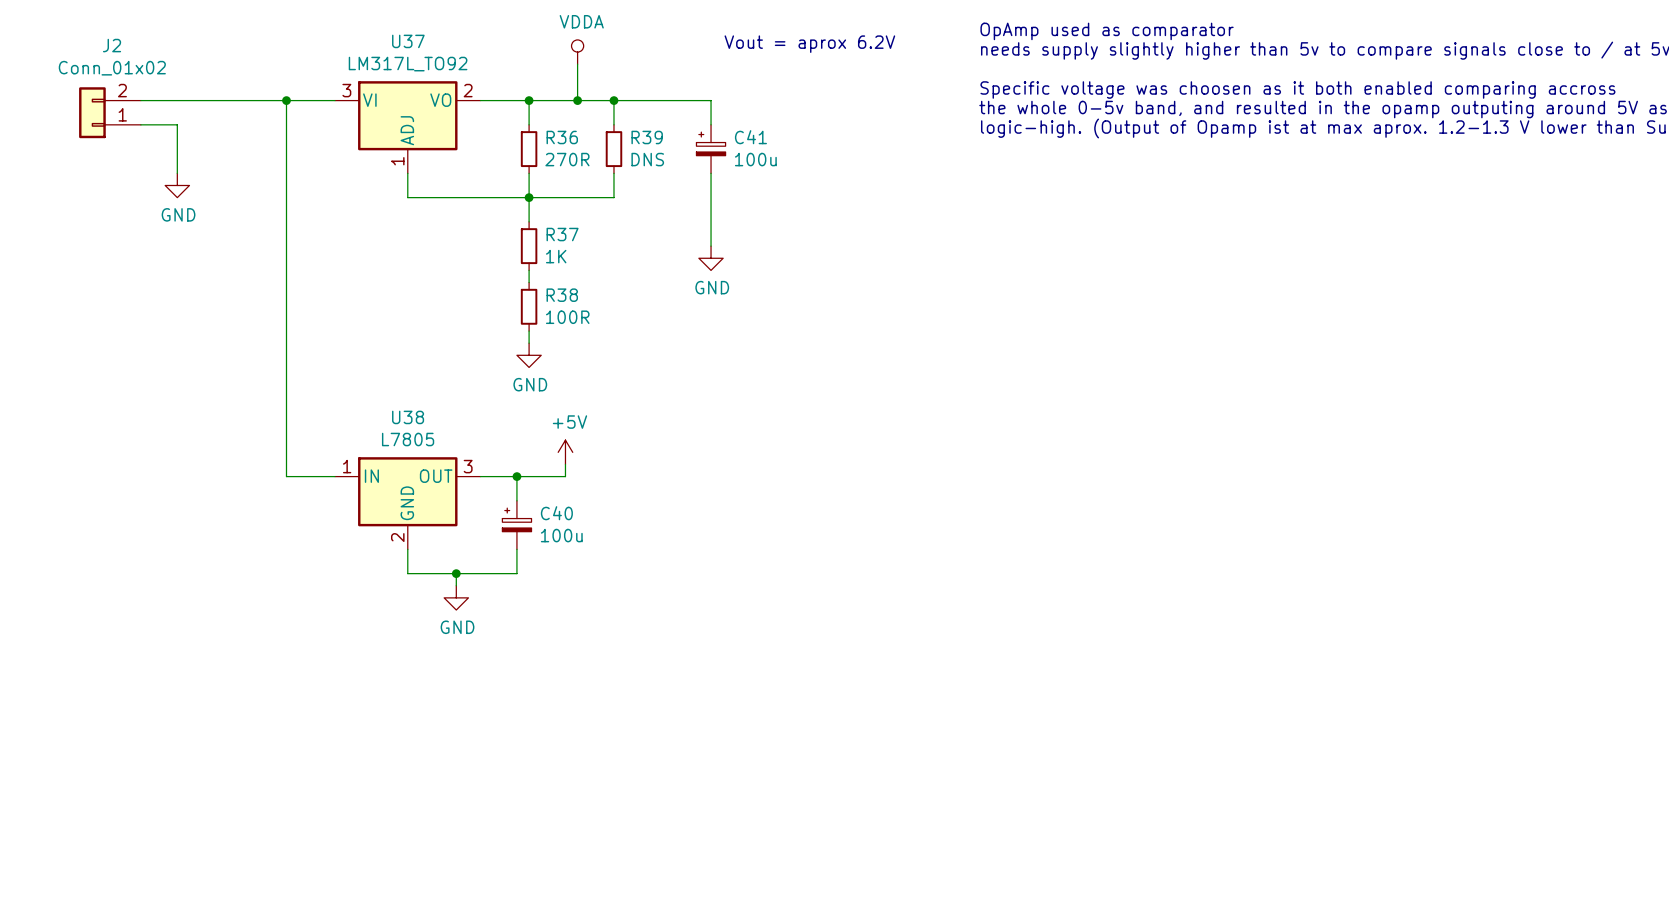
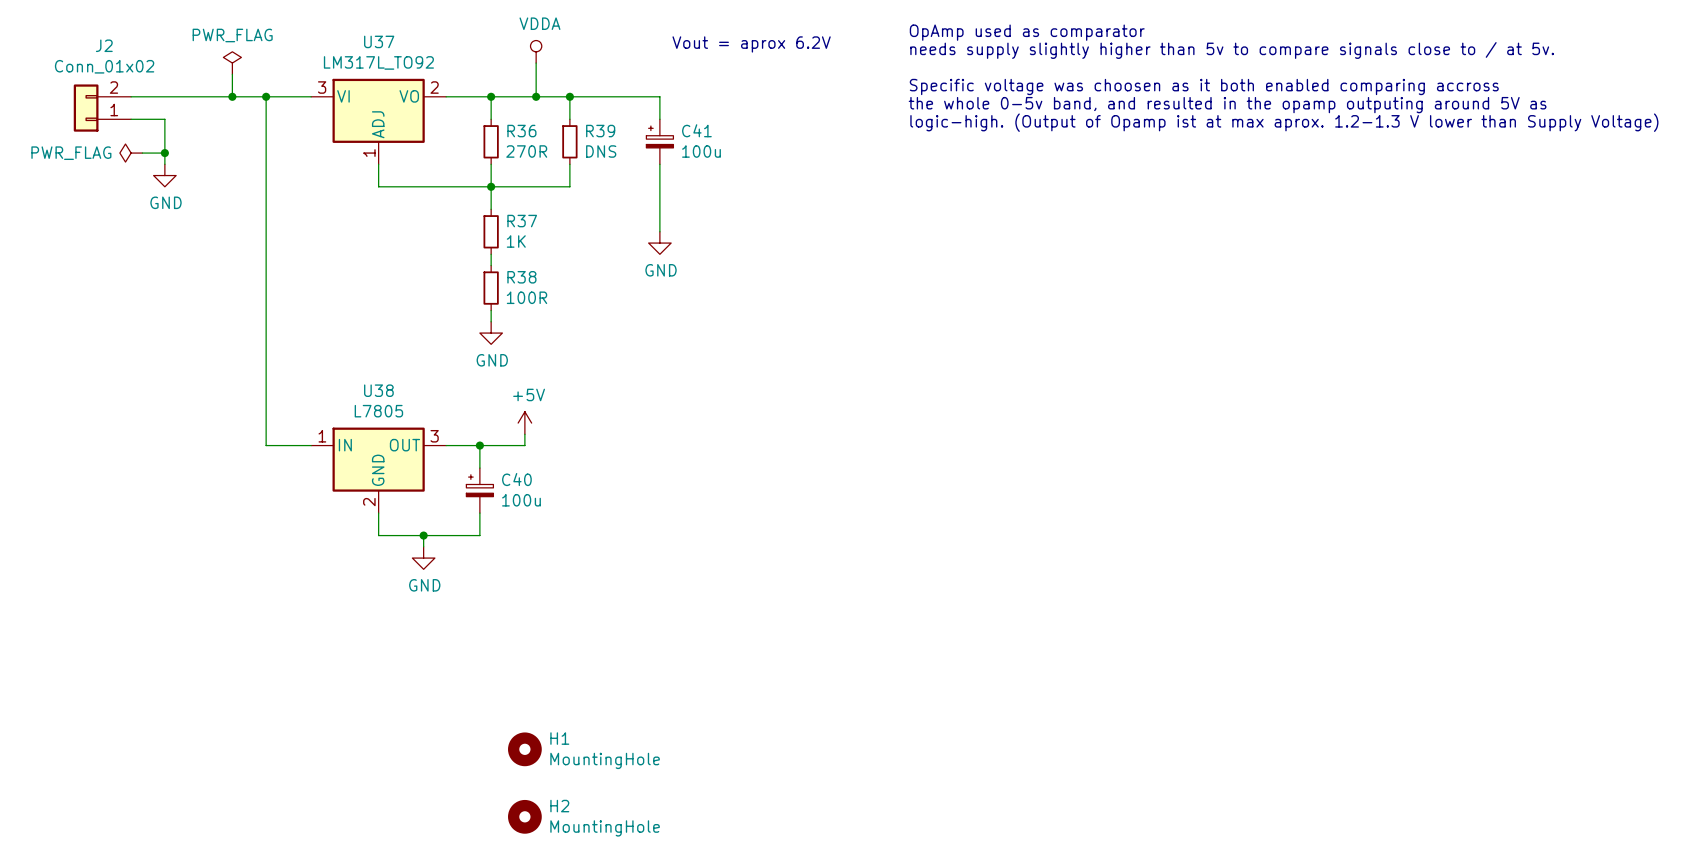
power symbol: none -> PWR_FLAG (232, 63)
wire: none -> (232, 74) (232, 96)
junction: none -> (232, 96)
power symbol: none -> PWR_FLAG (131, 153)
wire: none -> (142, 153) (164, 153)
junction: none -> (164, 153)
H1: none -> MountingHole (524, 749)
H2: none -> MountingHole (524, 816)

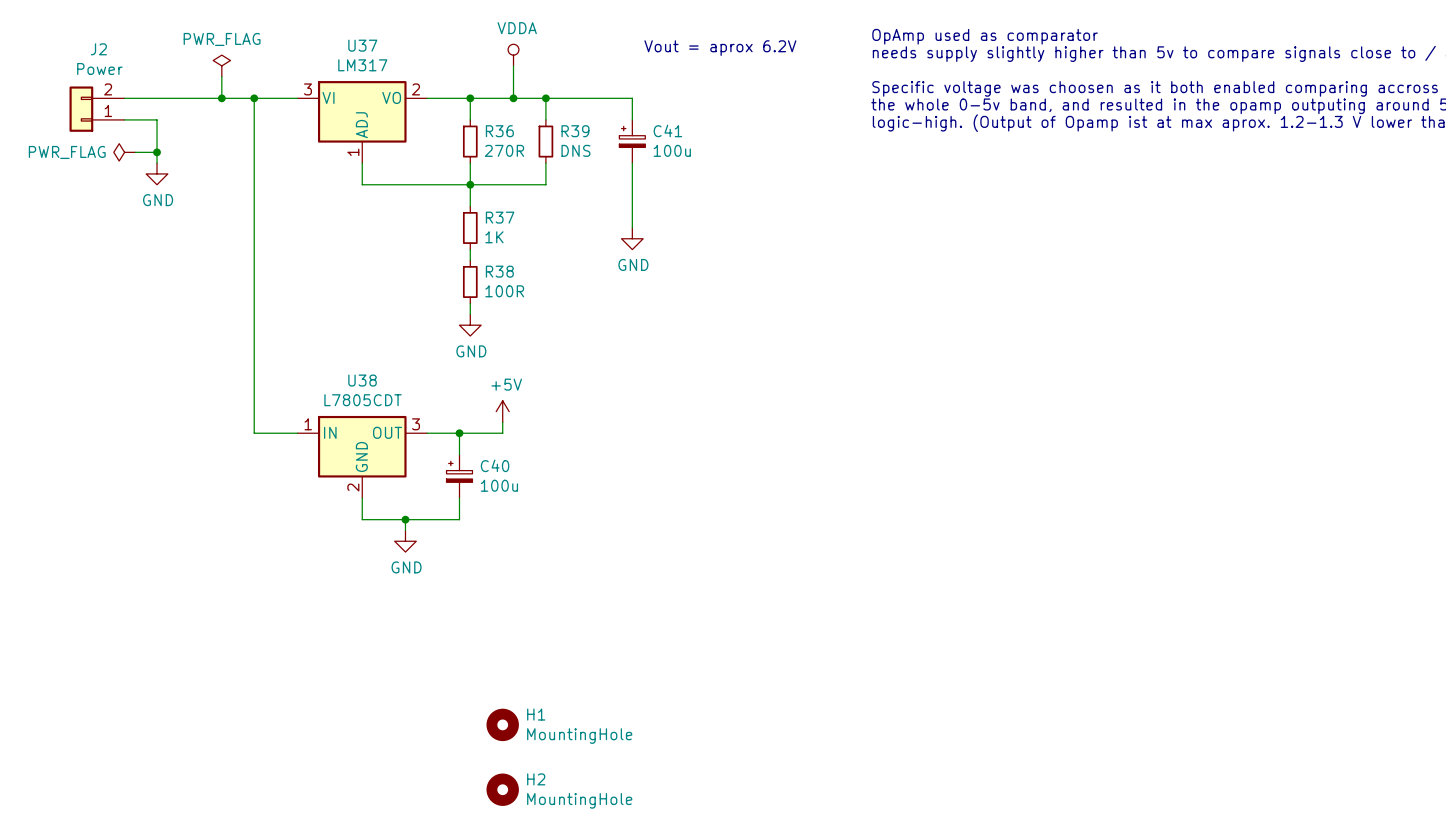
U37 value: LM317L_TO92 (378, 62) -> LM317 (362, 65)
J2 value: Conn_01x02 (104, 66) -> Power (99, 68)
U38 value: L7805 (378, 411) -> L7805CDT (363, 400)

